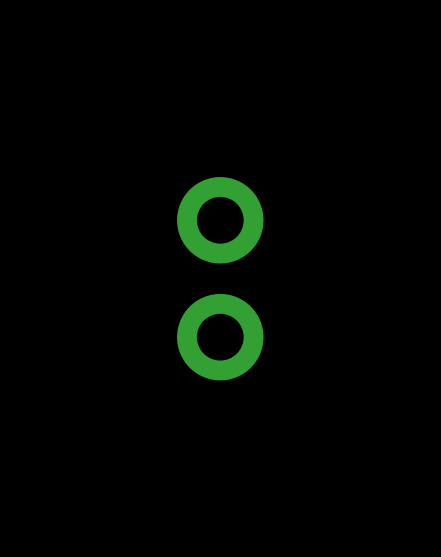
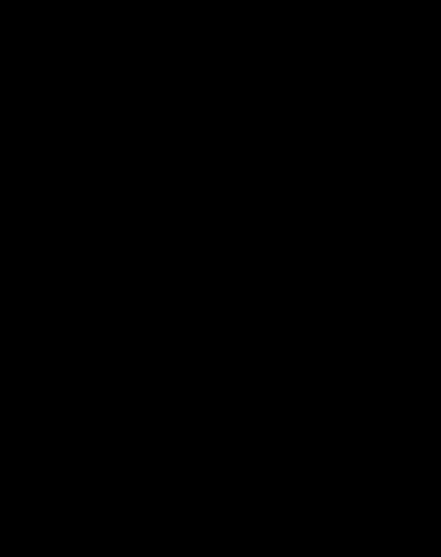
part: (220, 278) -> none

